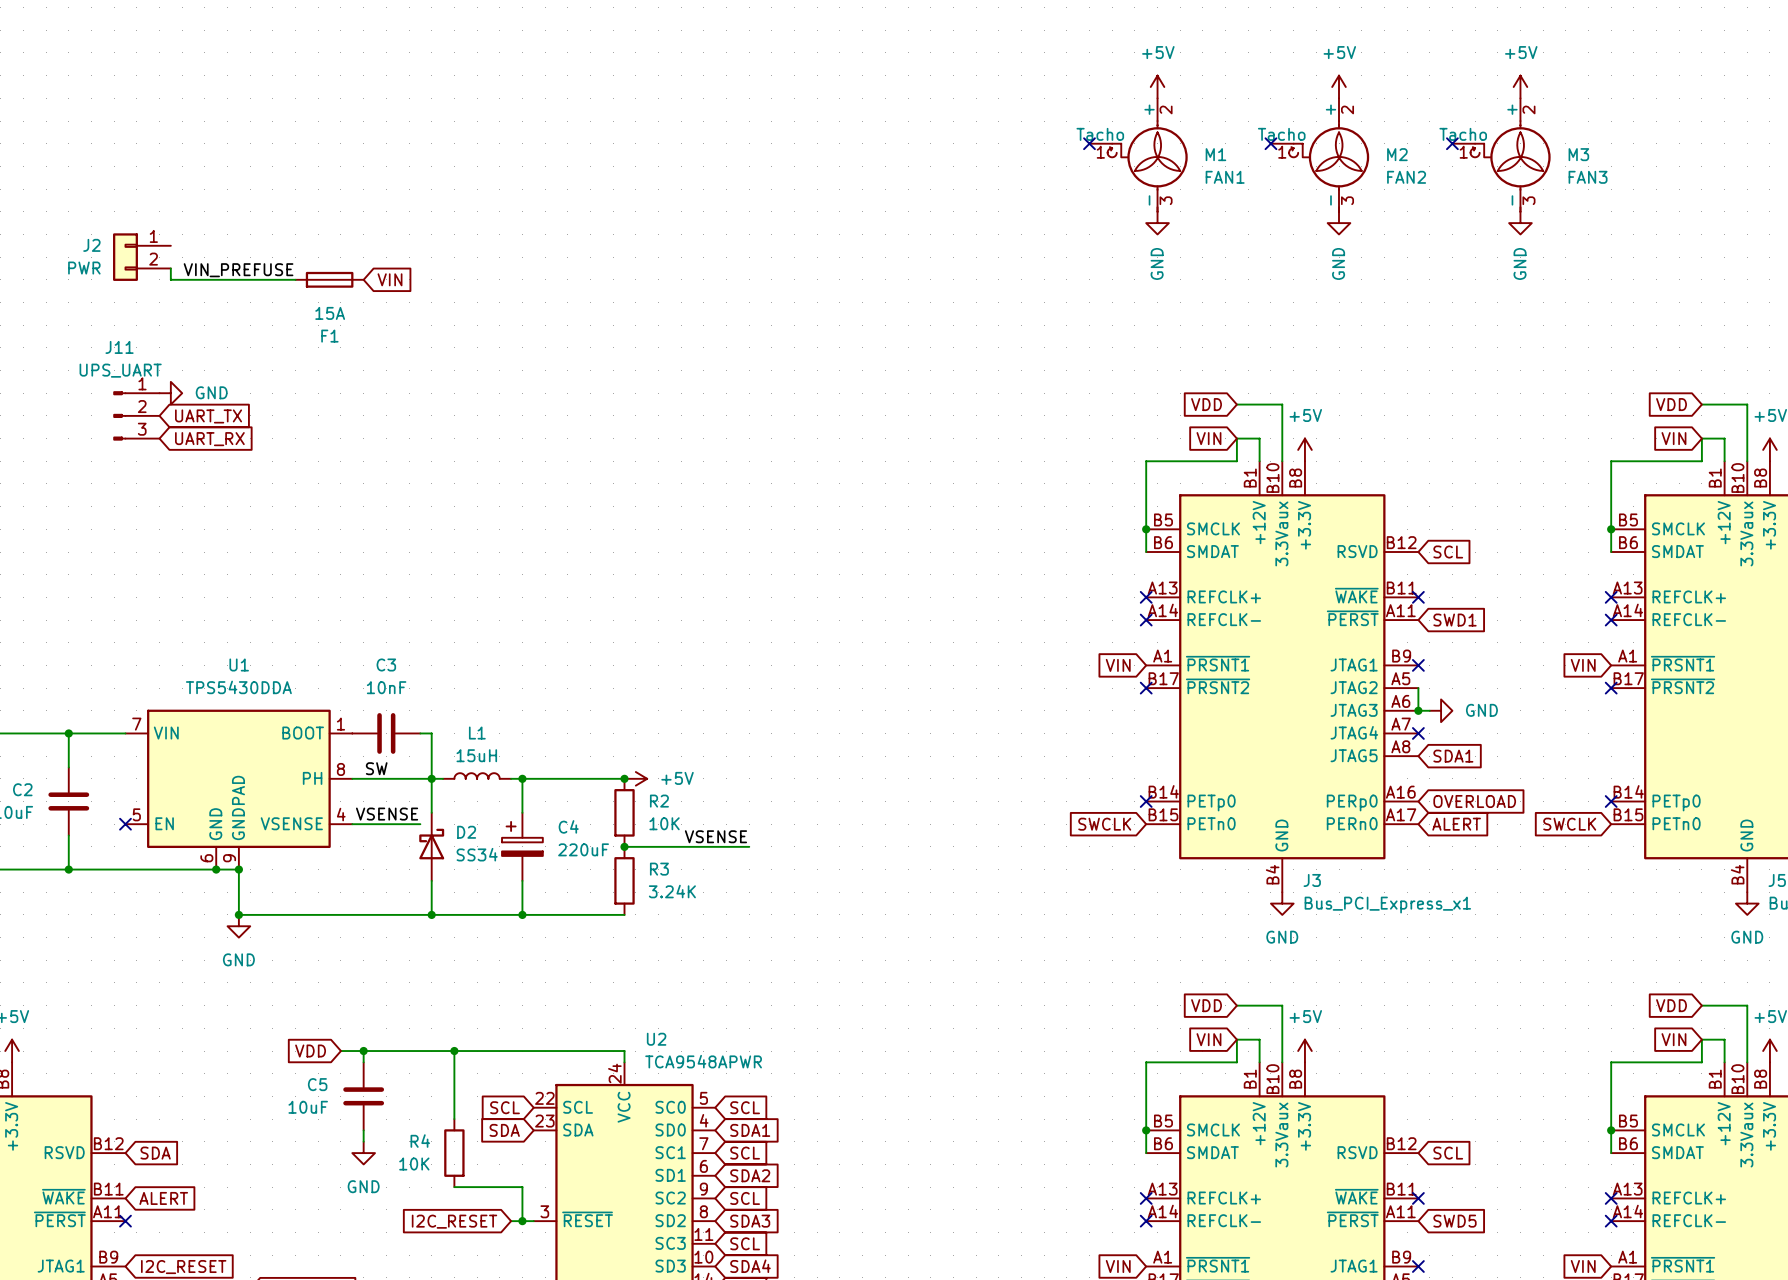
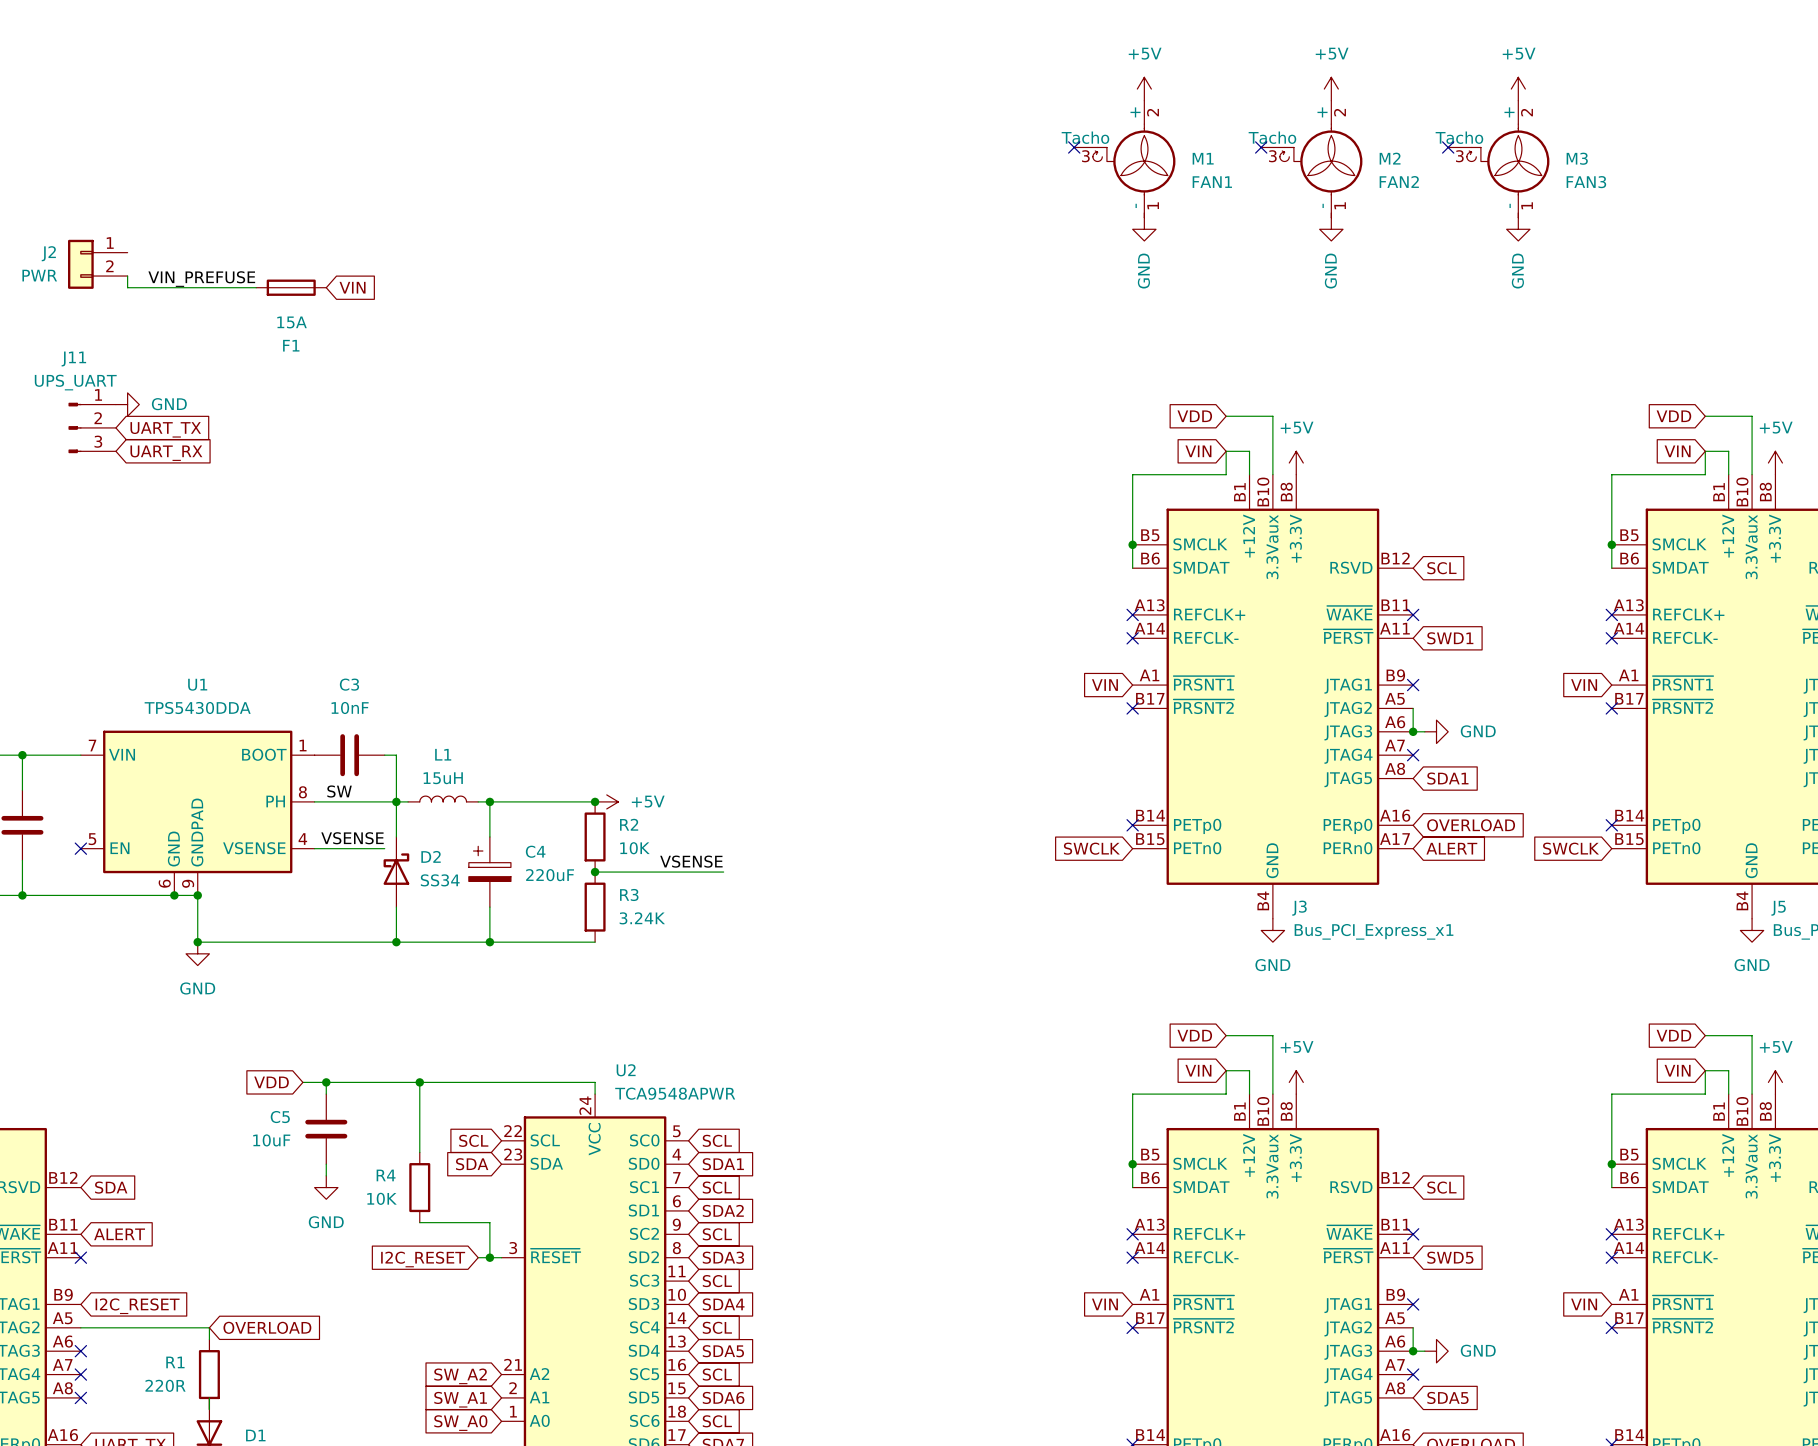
M1 pin number: 1 (1100, 152) -> 3 (1085, 156)
M2 pin number: 1 (1282, 152) -> 3 (1272, 156)
M3 pin number: 1 (1463, 152) -> 3 (1459, 156)
M1 pin number: 3 (1166, 200) -> 1 (1153, 205)
M2 pin number: 3 (1347, 200) -> 1 (1340, 205)
M3 pin number: 3 (1528, 200) -> 1 (1527, 205)

